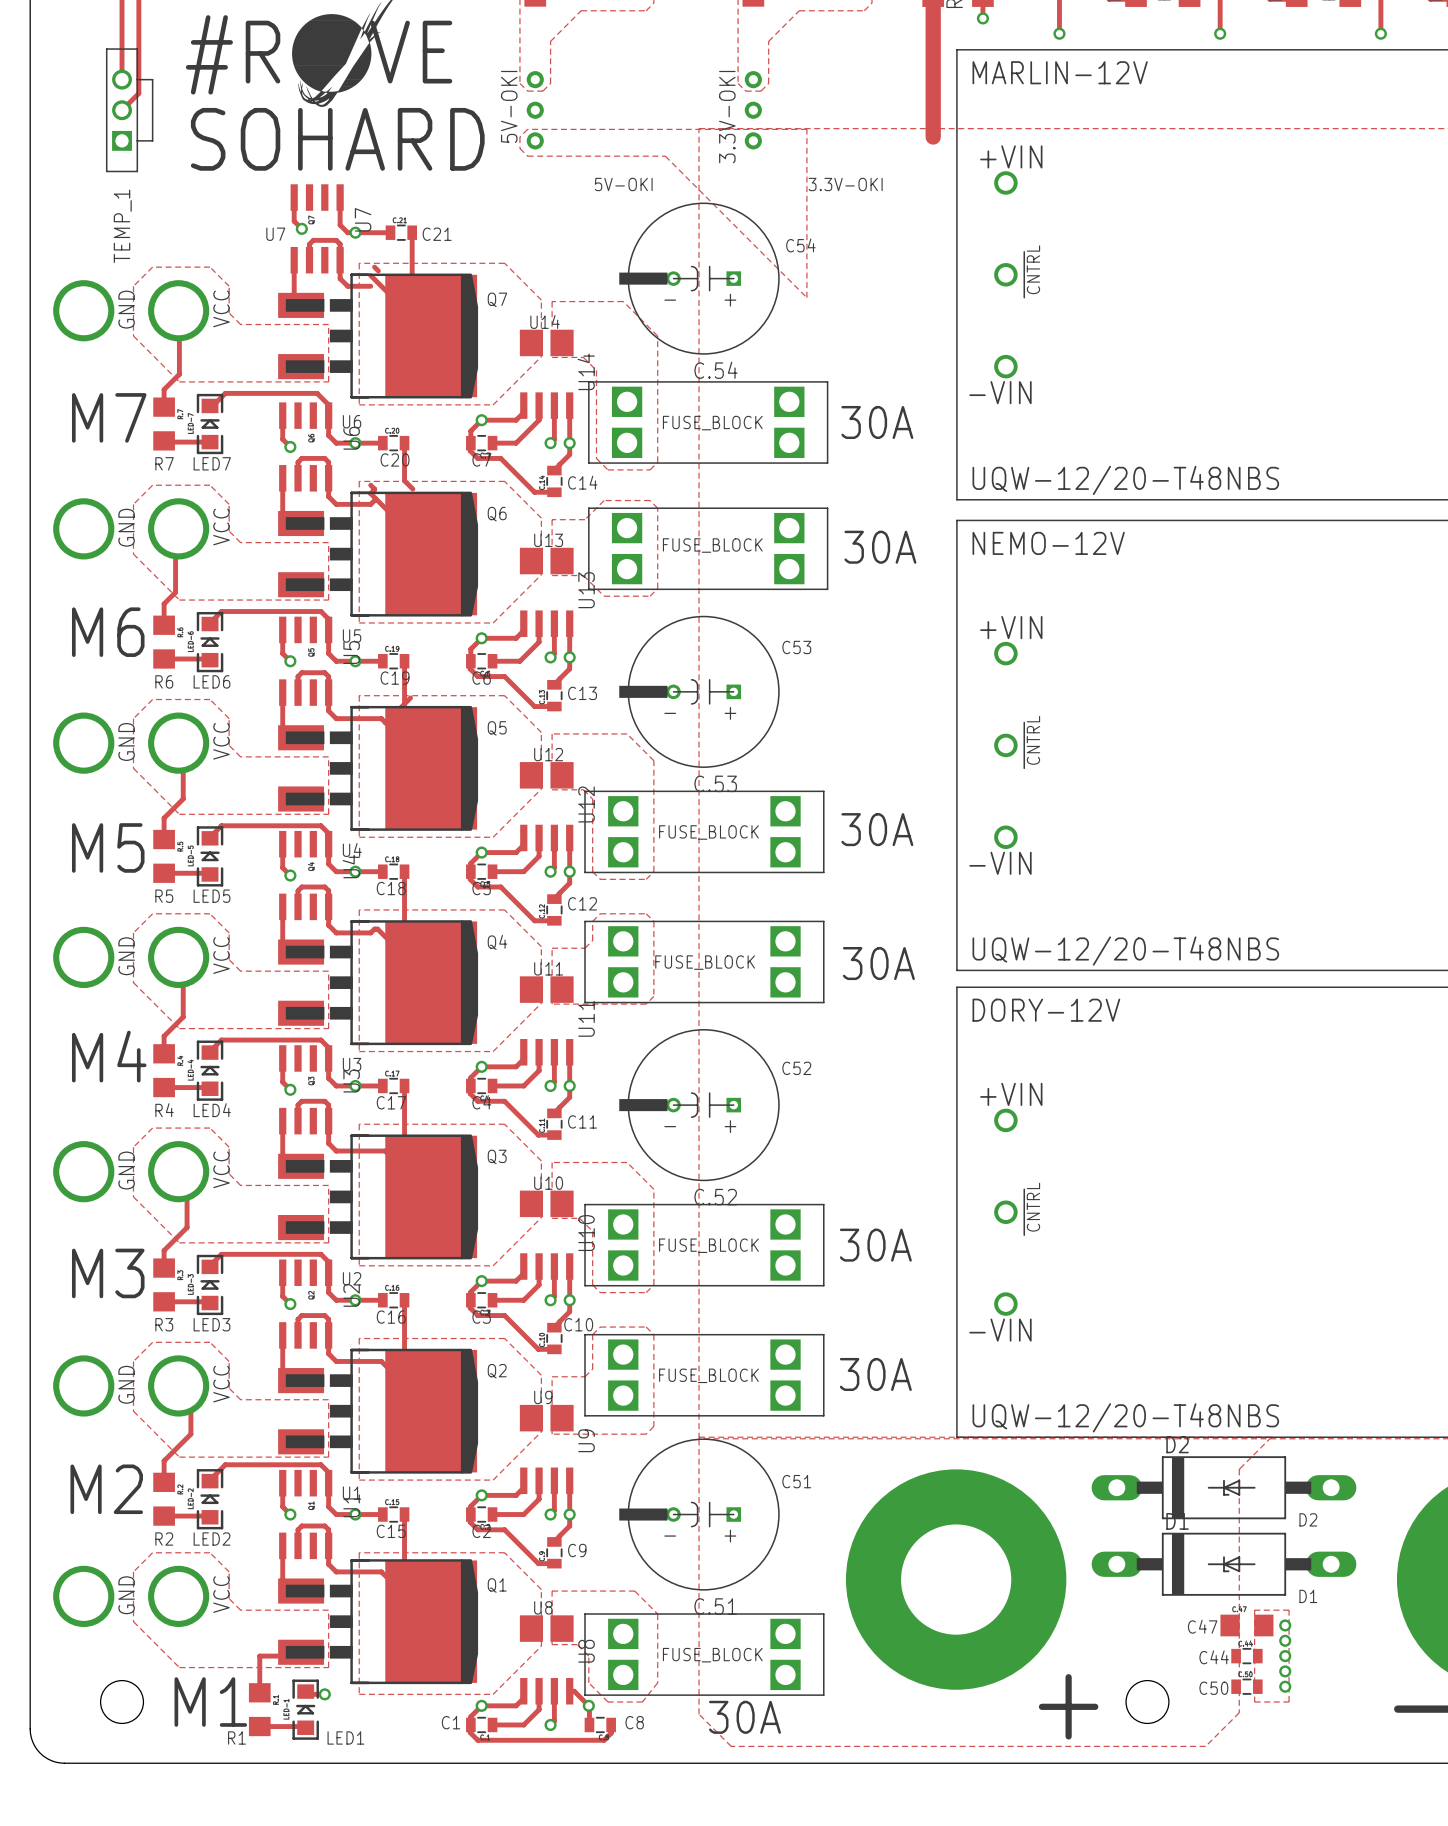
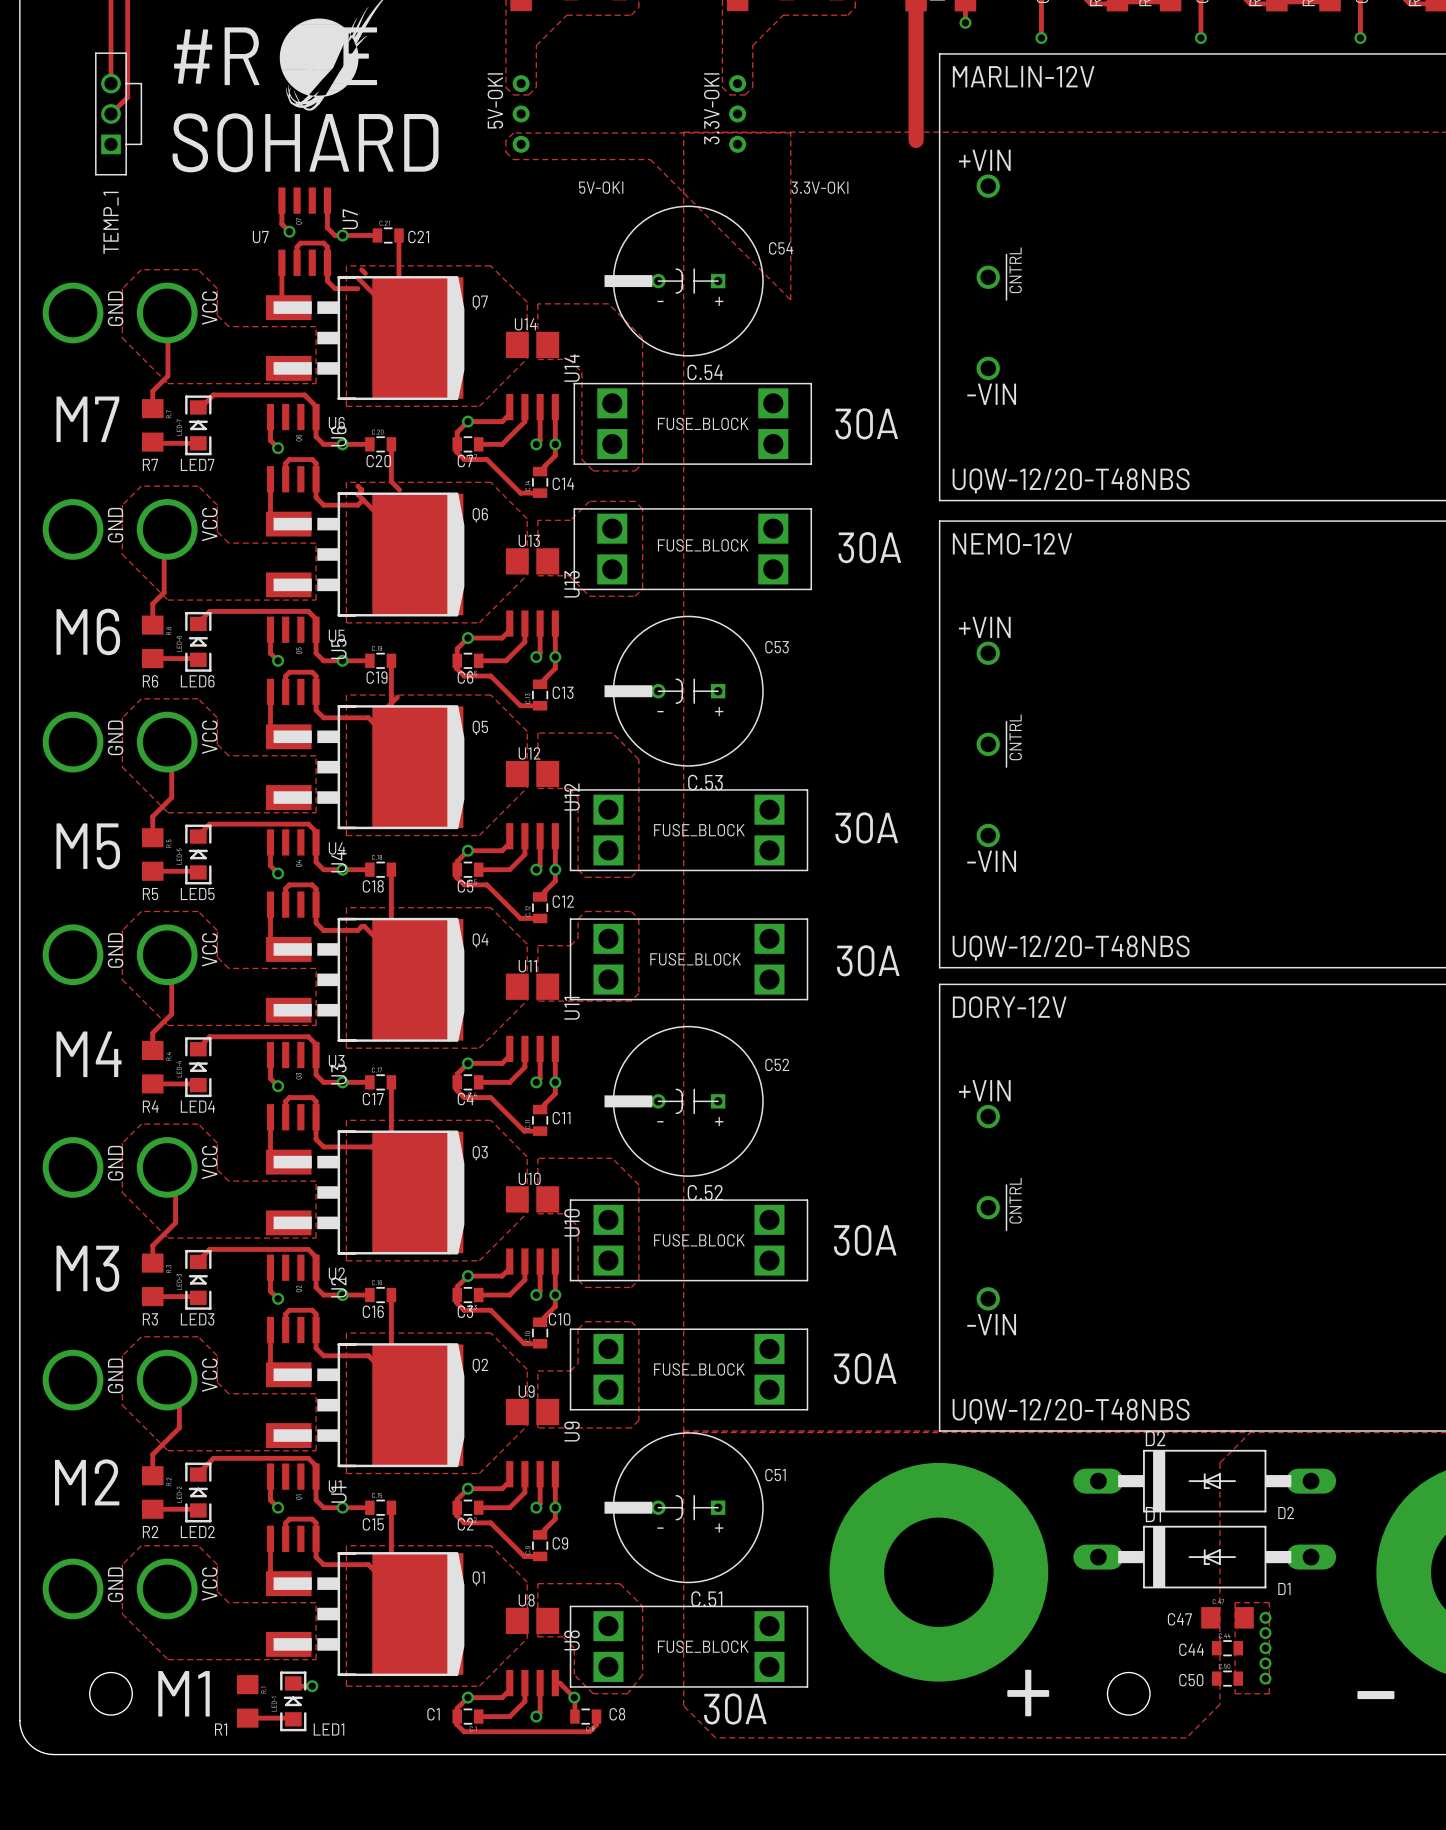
track: (297, 1656) (259, 1656) (259, 1692) -> none

